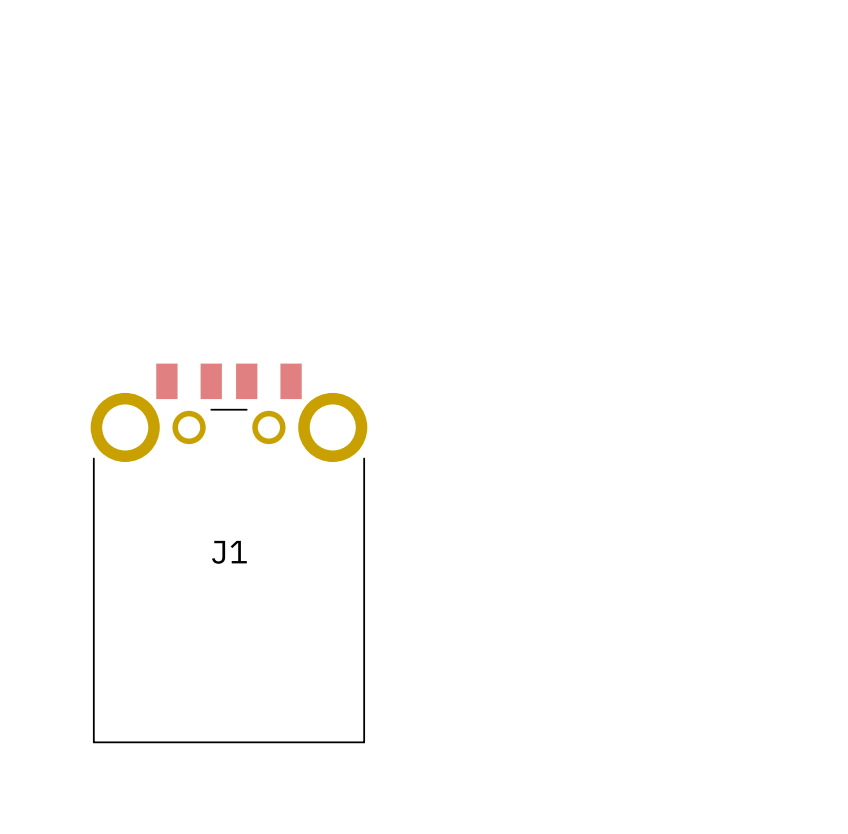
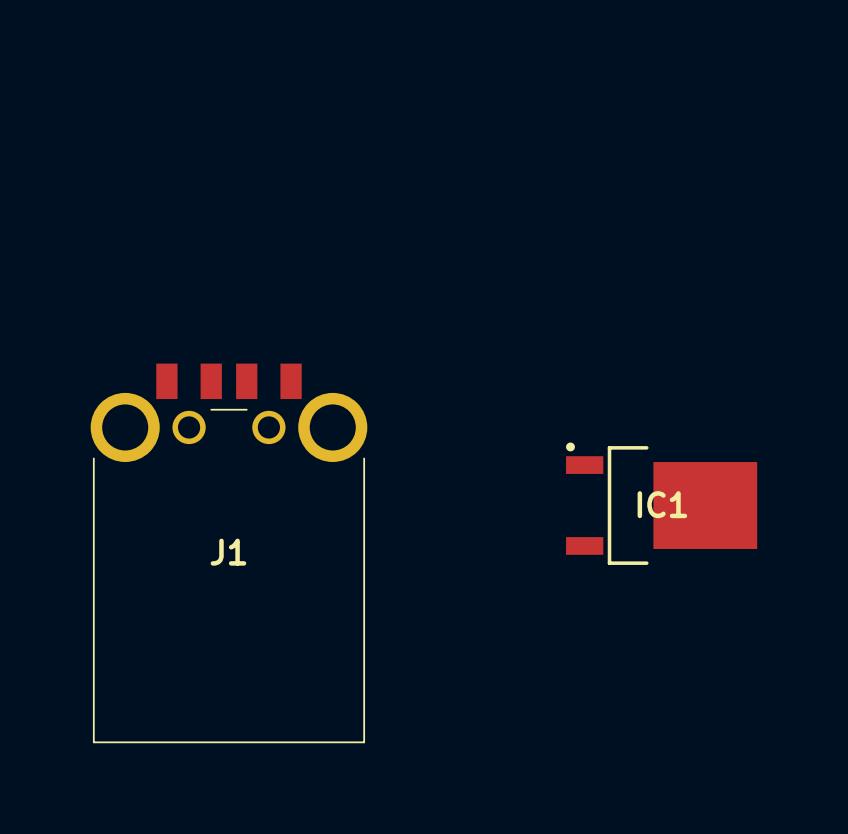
IC1: none -> (661, 503)

